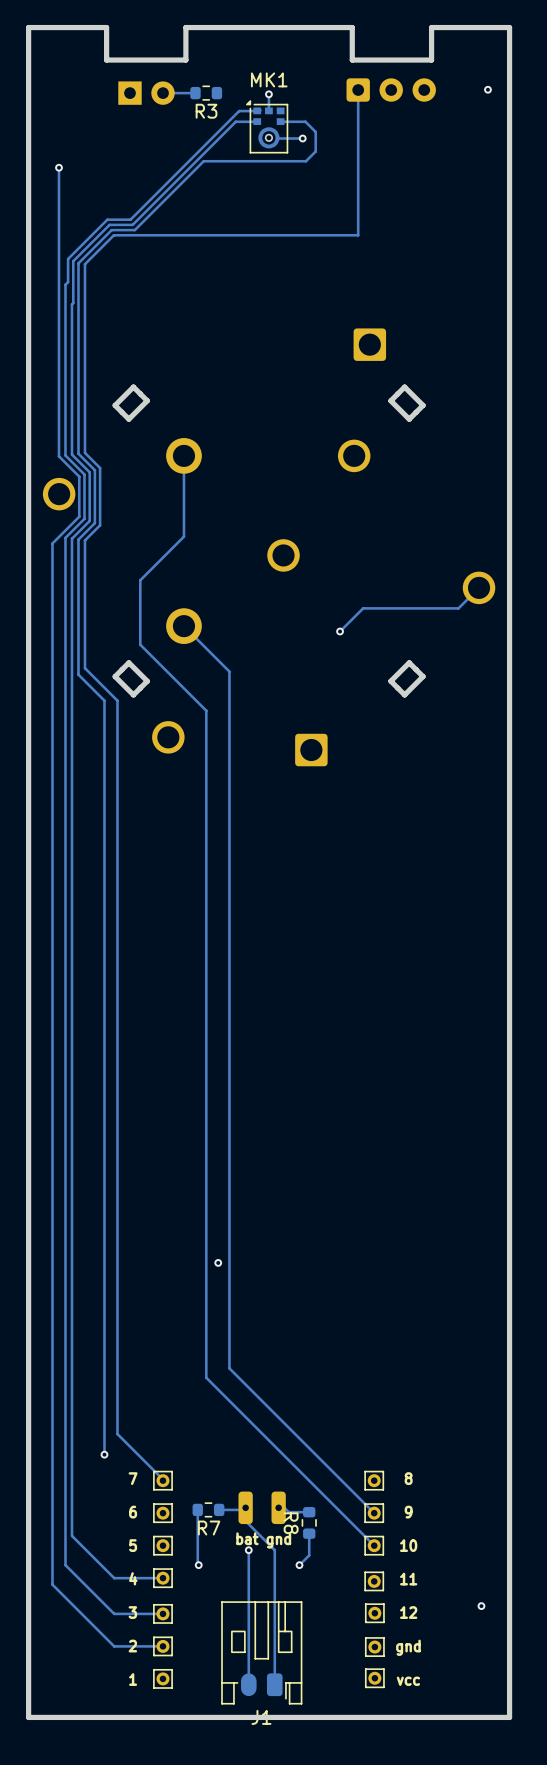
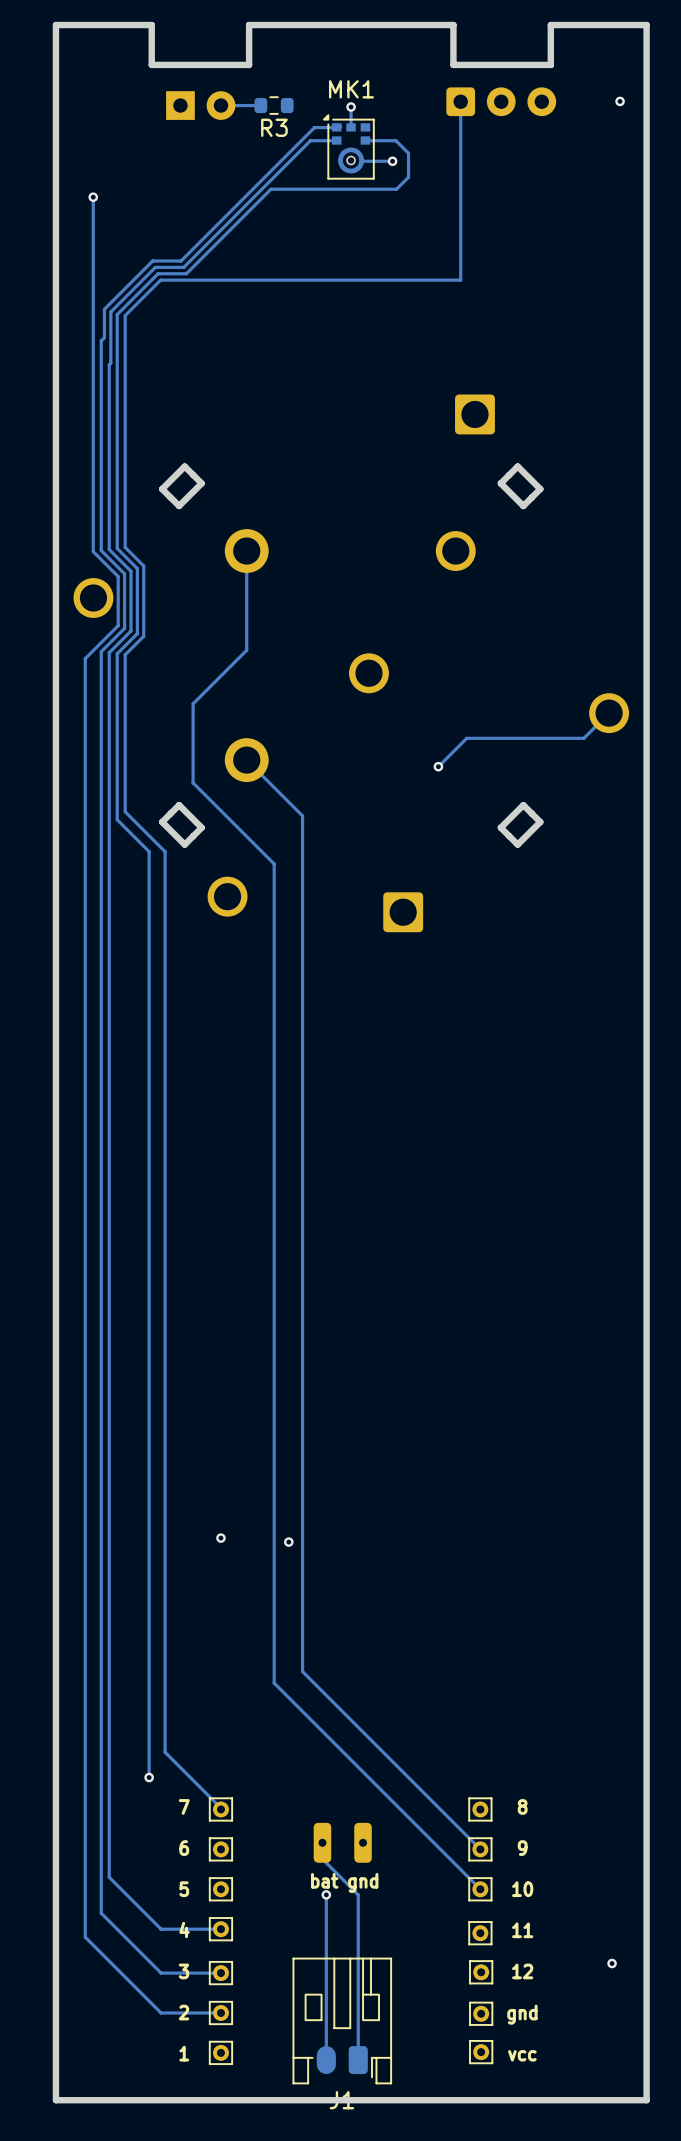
via: none -> (220, 1538)
track: (245, 1507) (243, 1509) (219, 1509) -> none
track: (197, 1509) (198, 1565) -> none
R7: (208, 1509) -> none
track: (280, 1509) (278, 1507) (284, 1507) (288, 1512) (309, 1512) -> none
R8: (309, 1522) -> none
track: (309, 1533) (309, 1555) (299, 1565) -> none
via: (198, 1565) -> none
via: (299, 1565) -> none

